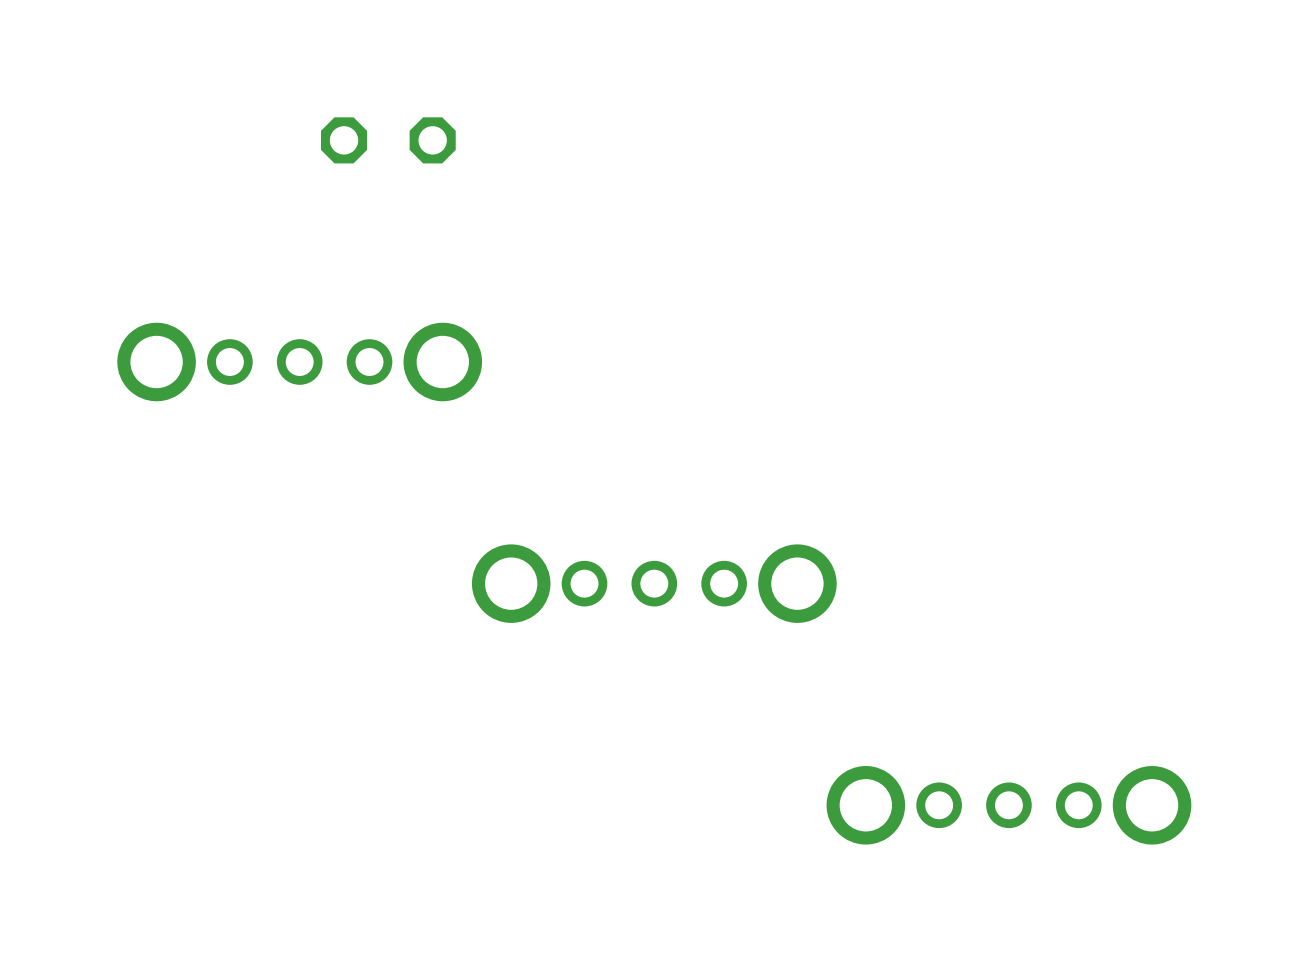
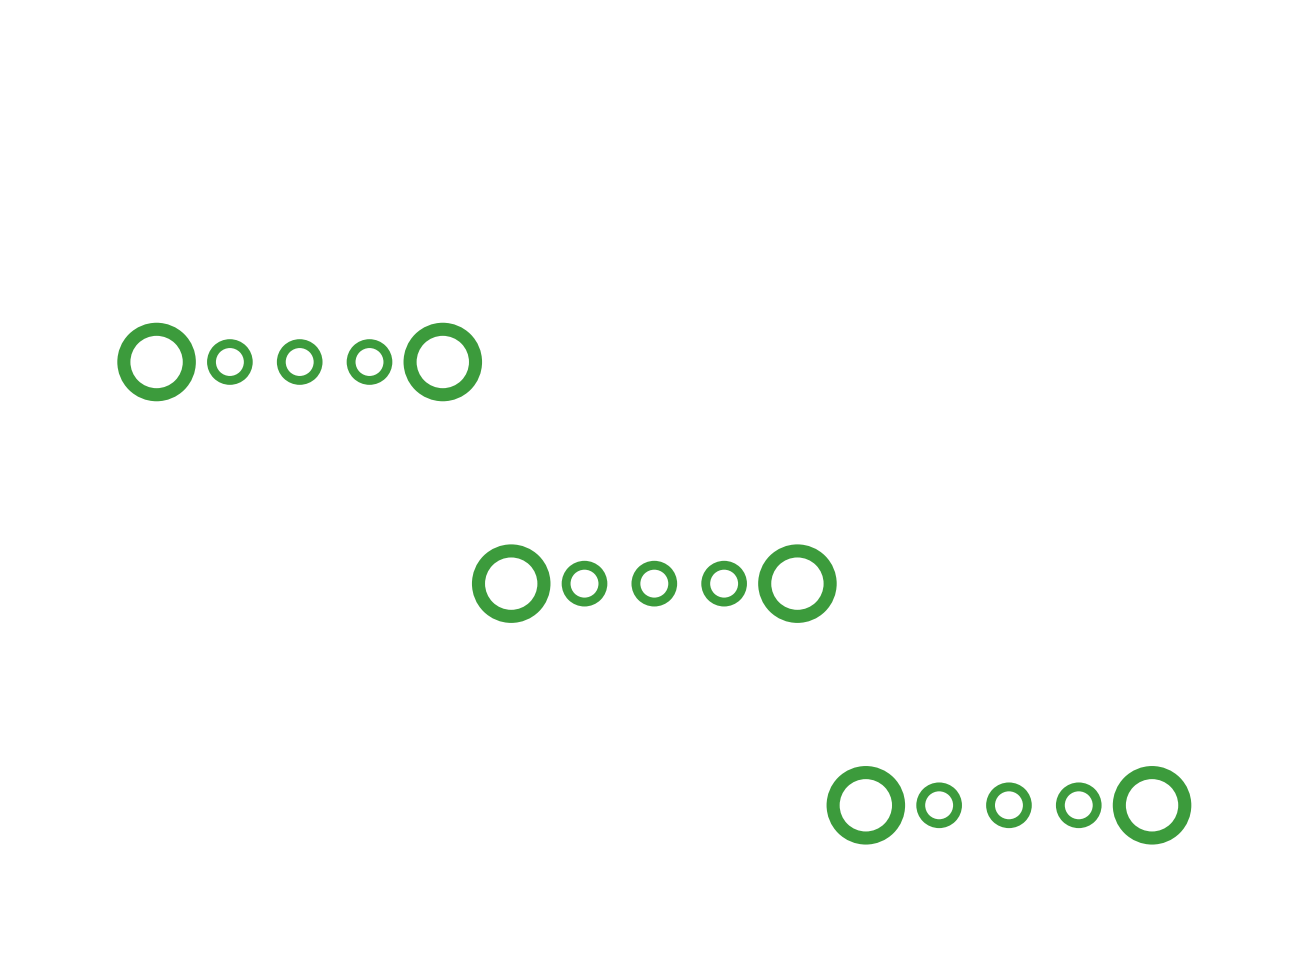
part: (388, 140) -> none

